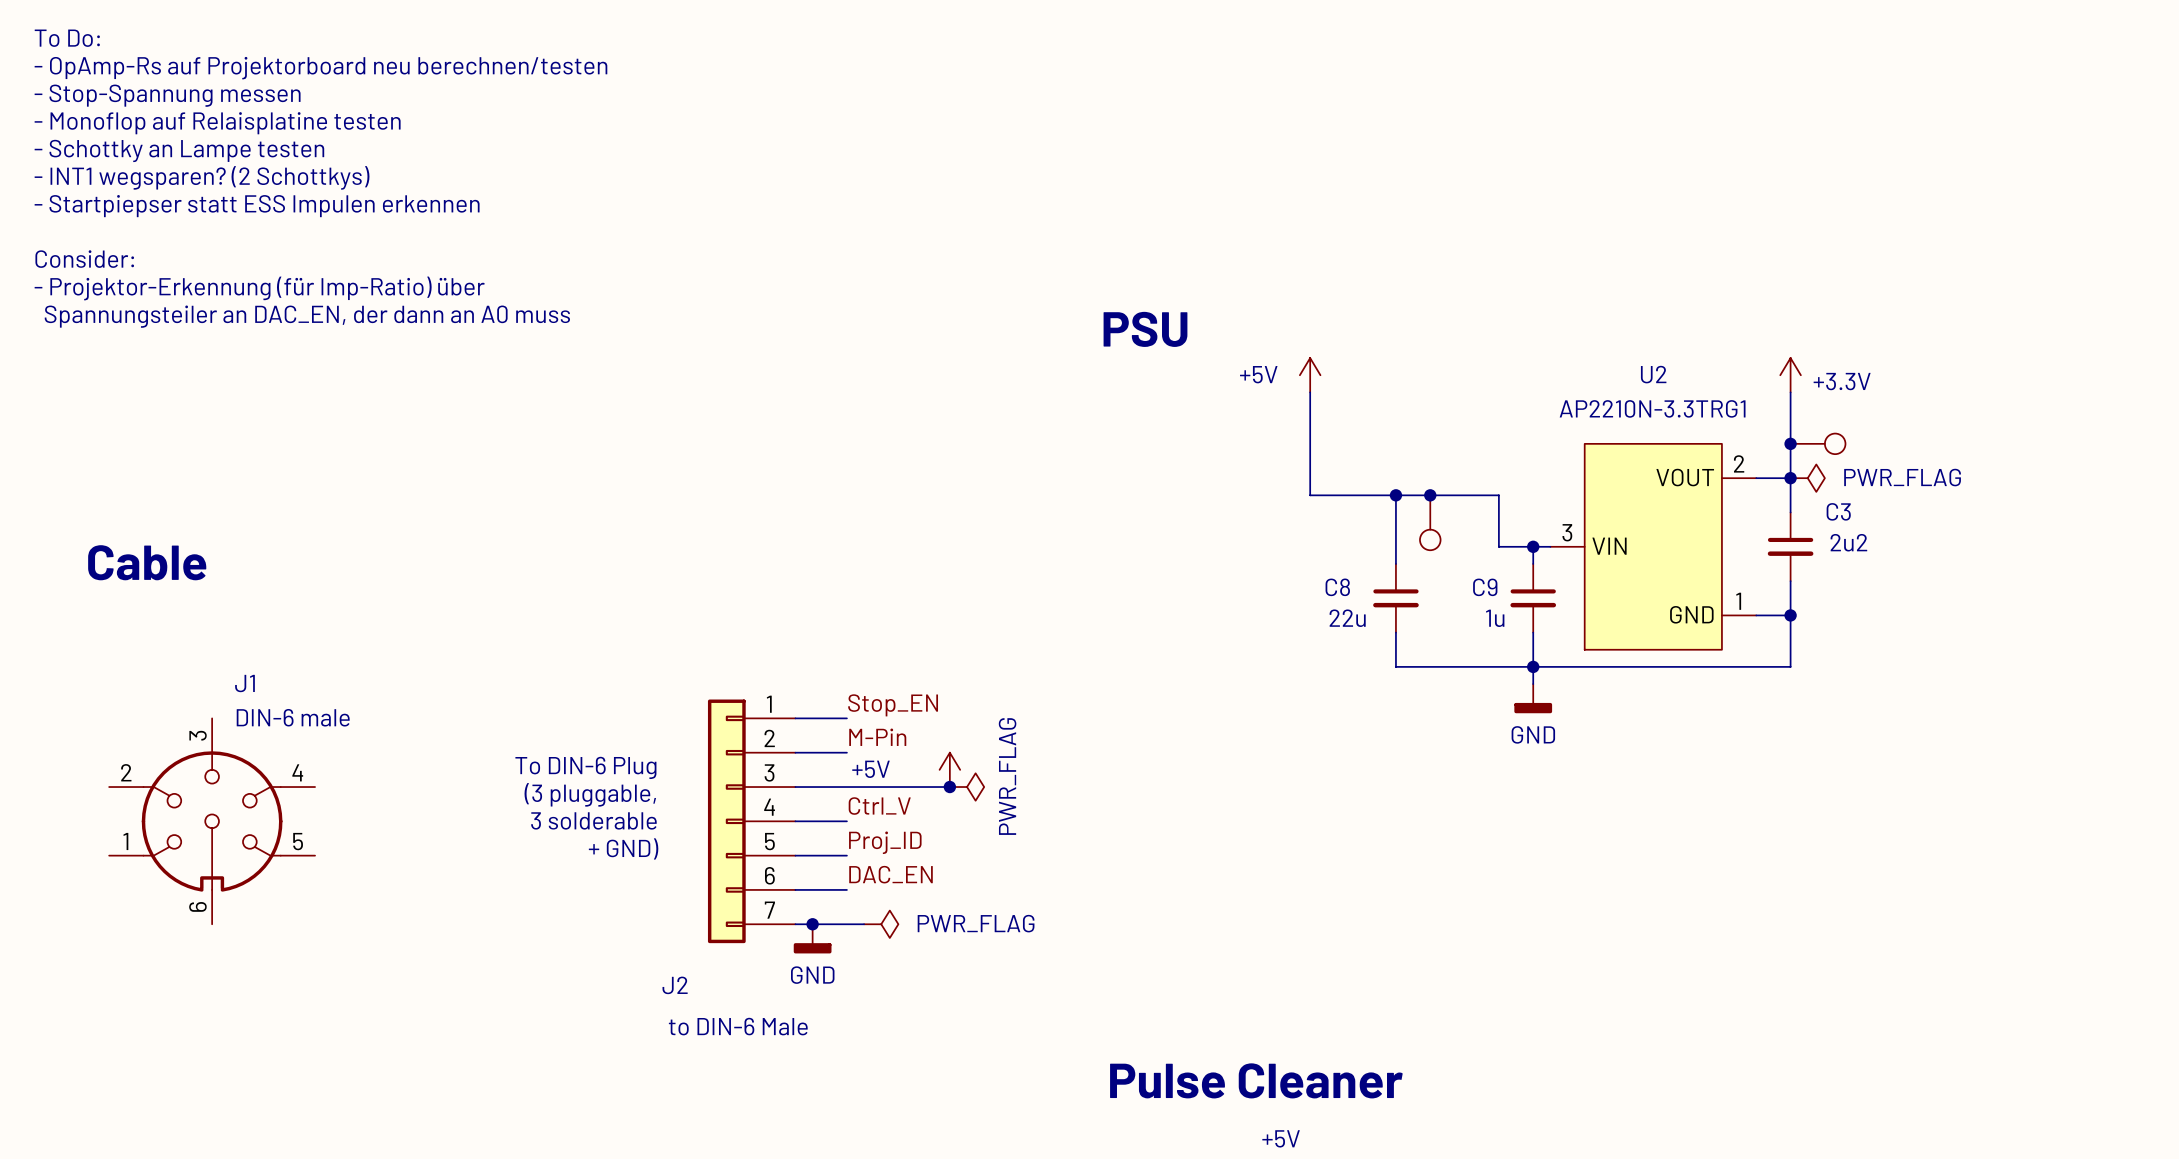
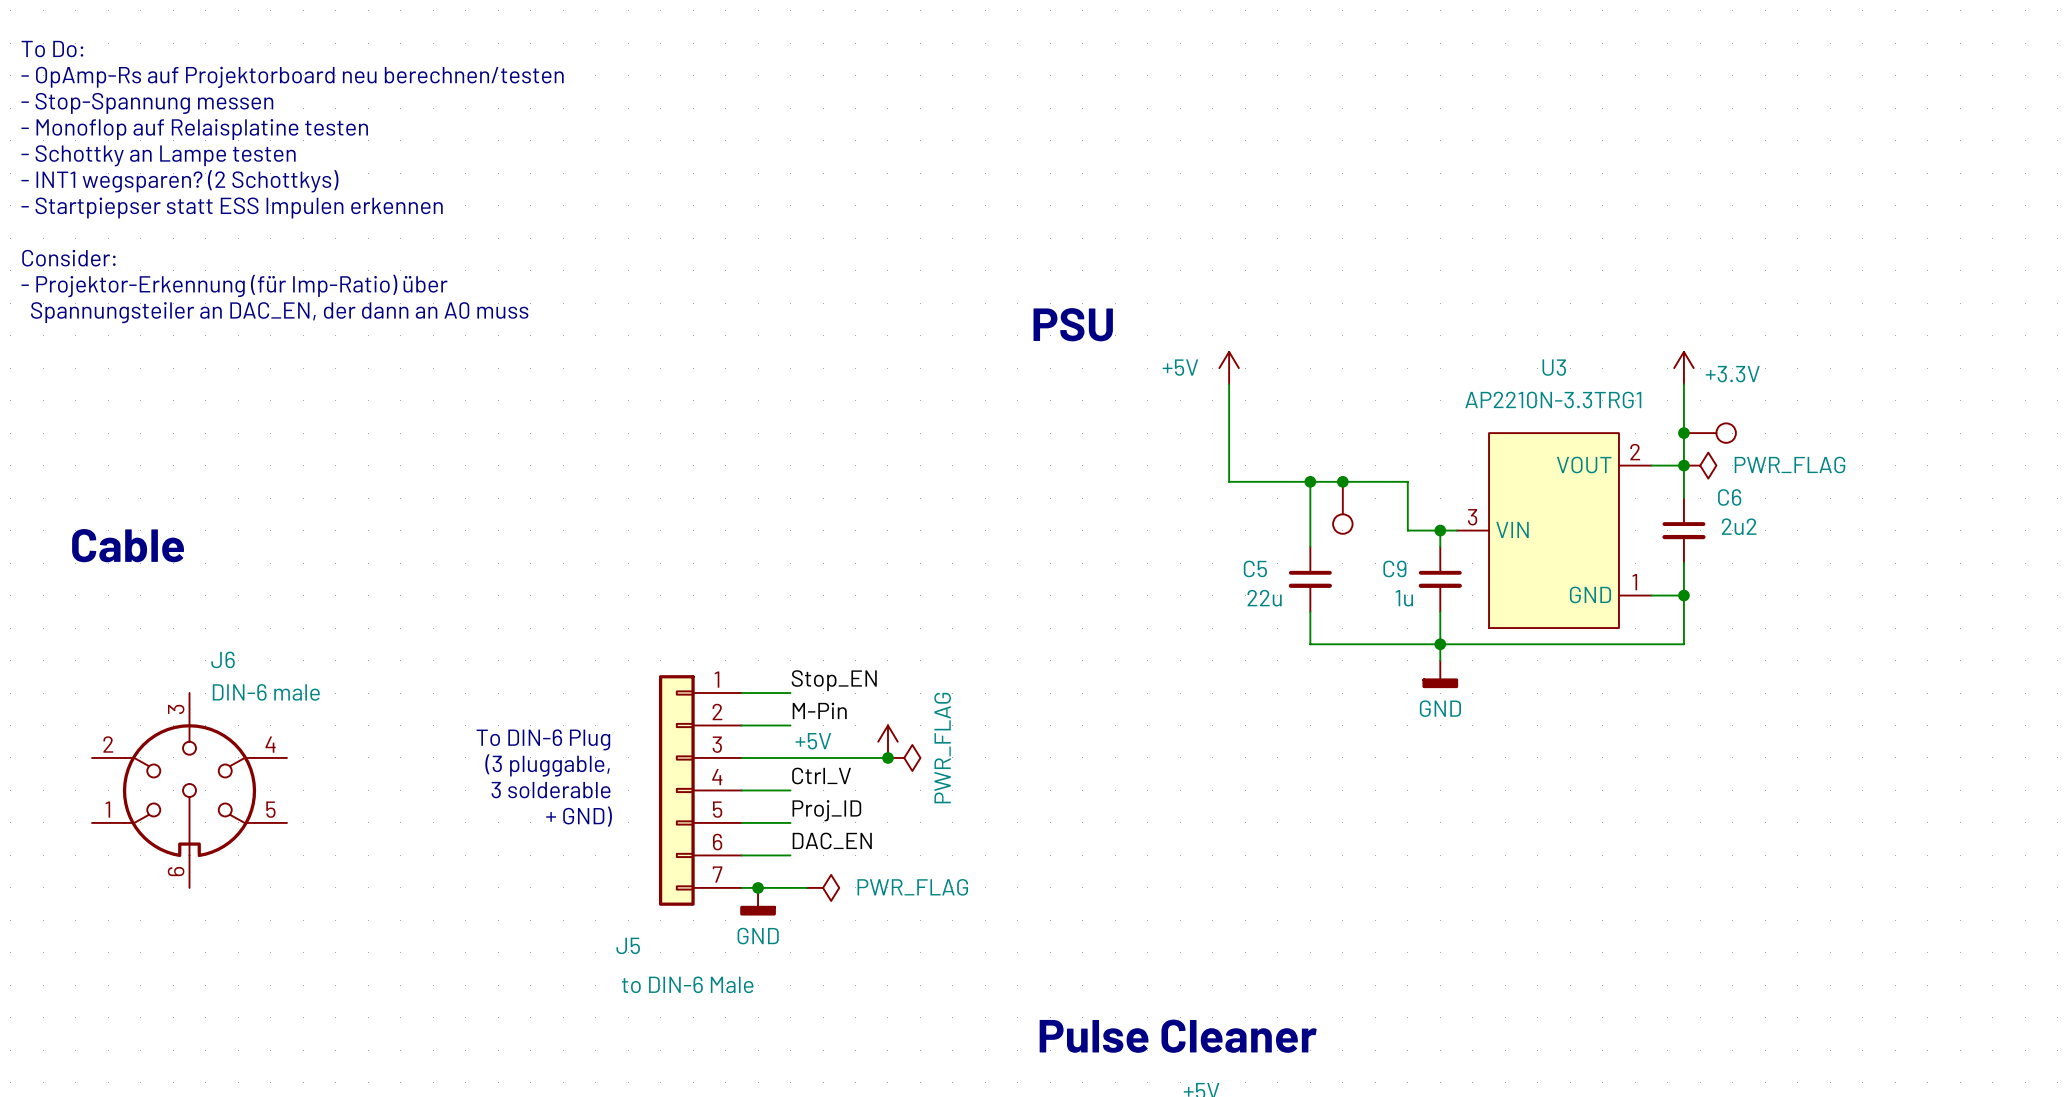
U2 name: U2 (1653, 374) -> U3 (1554, 367)
C3 name: C3 (1838, 511) -> C6 (1729, 497)
C8 name: C8 (1337, 587) -> C5 (1255, 568)
J1 name: J1 (244, 683) -> J6 (223, 659)
J2 name: J2 (675, 985) -> J5 (628, 945)

